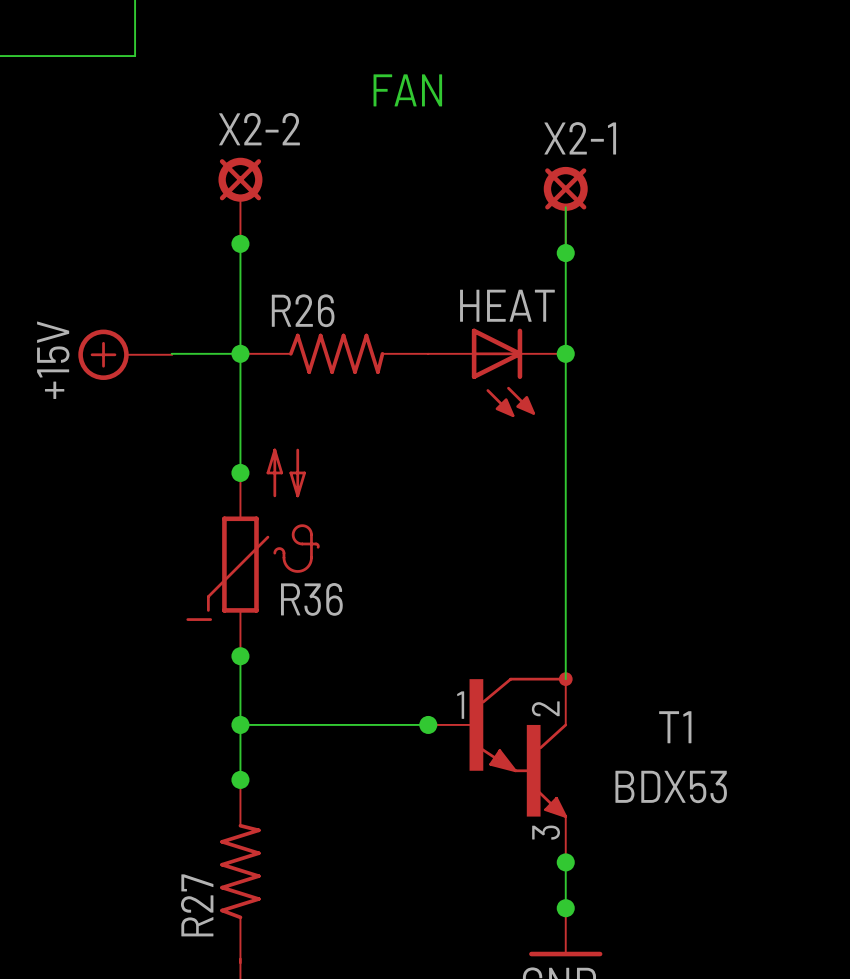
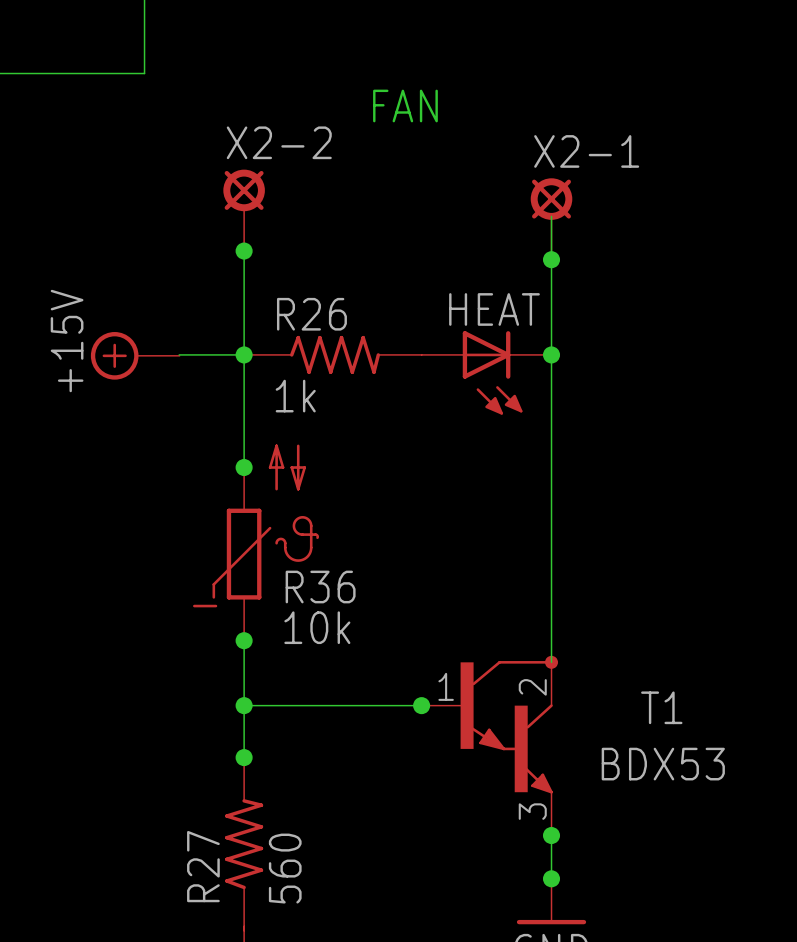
R26 value: none -> 1k (295, 396)
R36 value: none -> 10k (317, 627)
R27 value: none -> 560 (285, 868)

